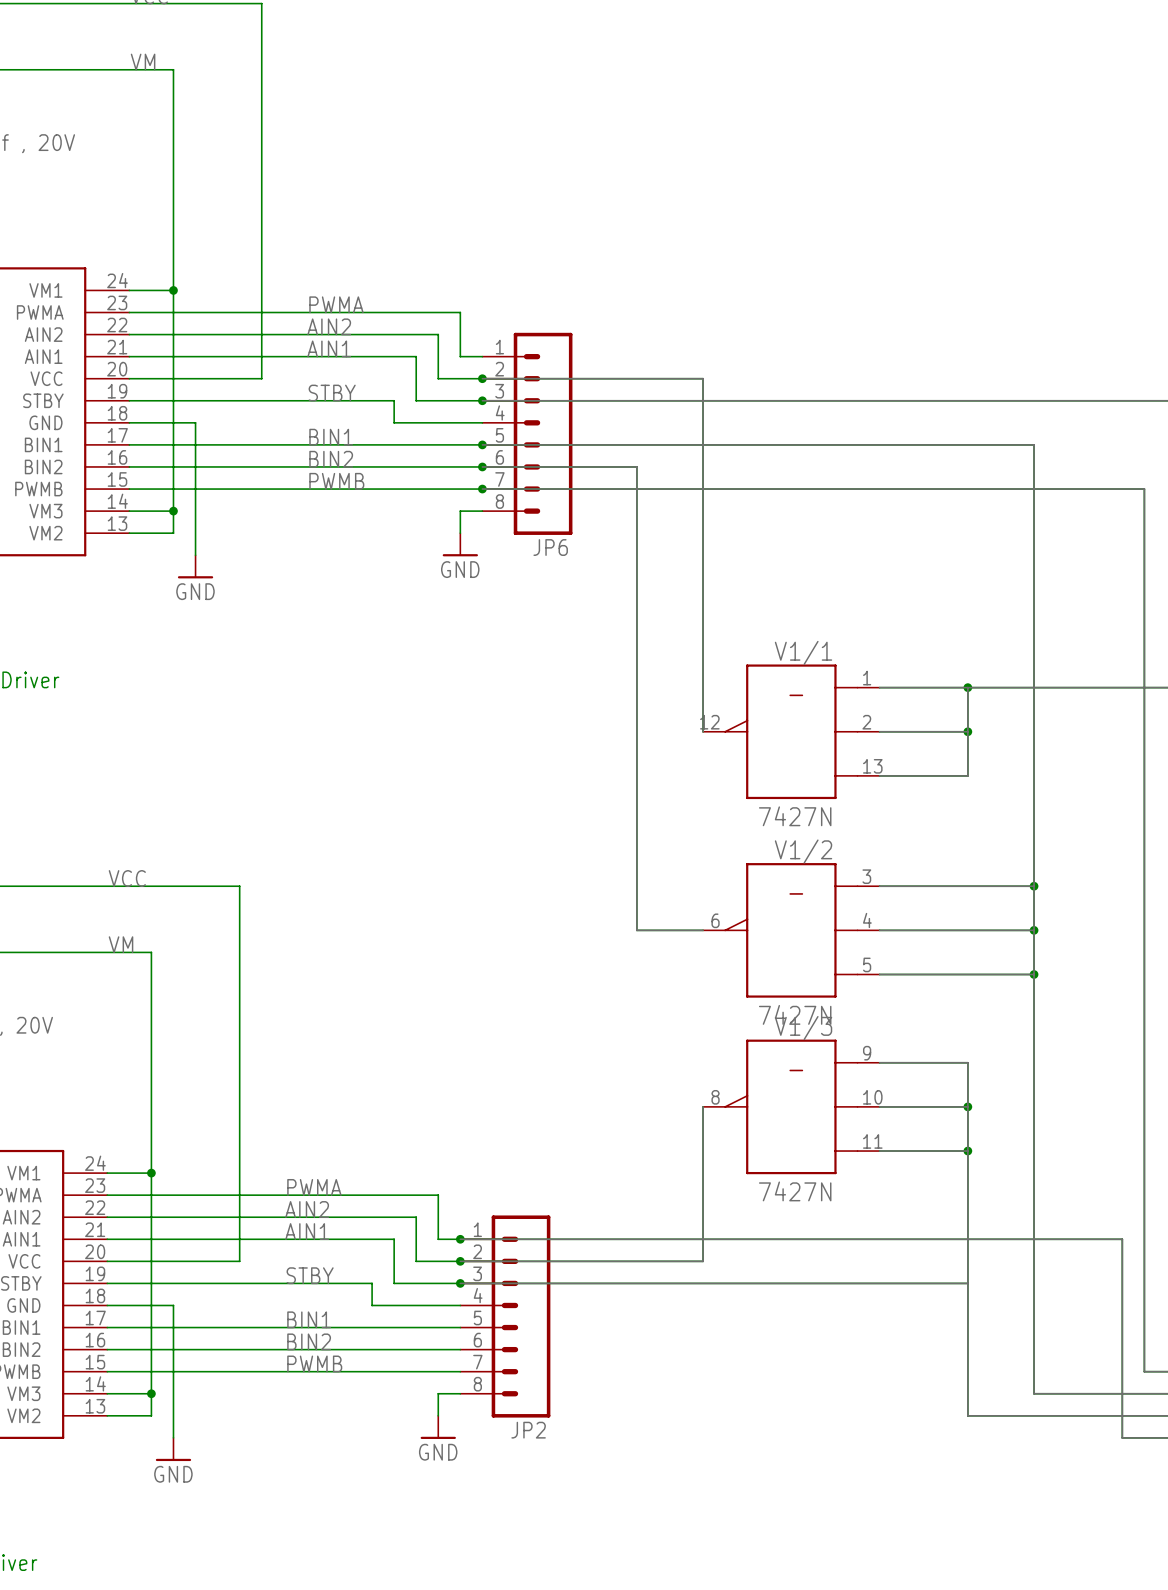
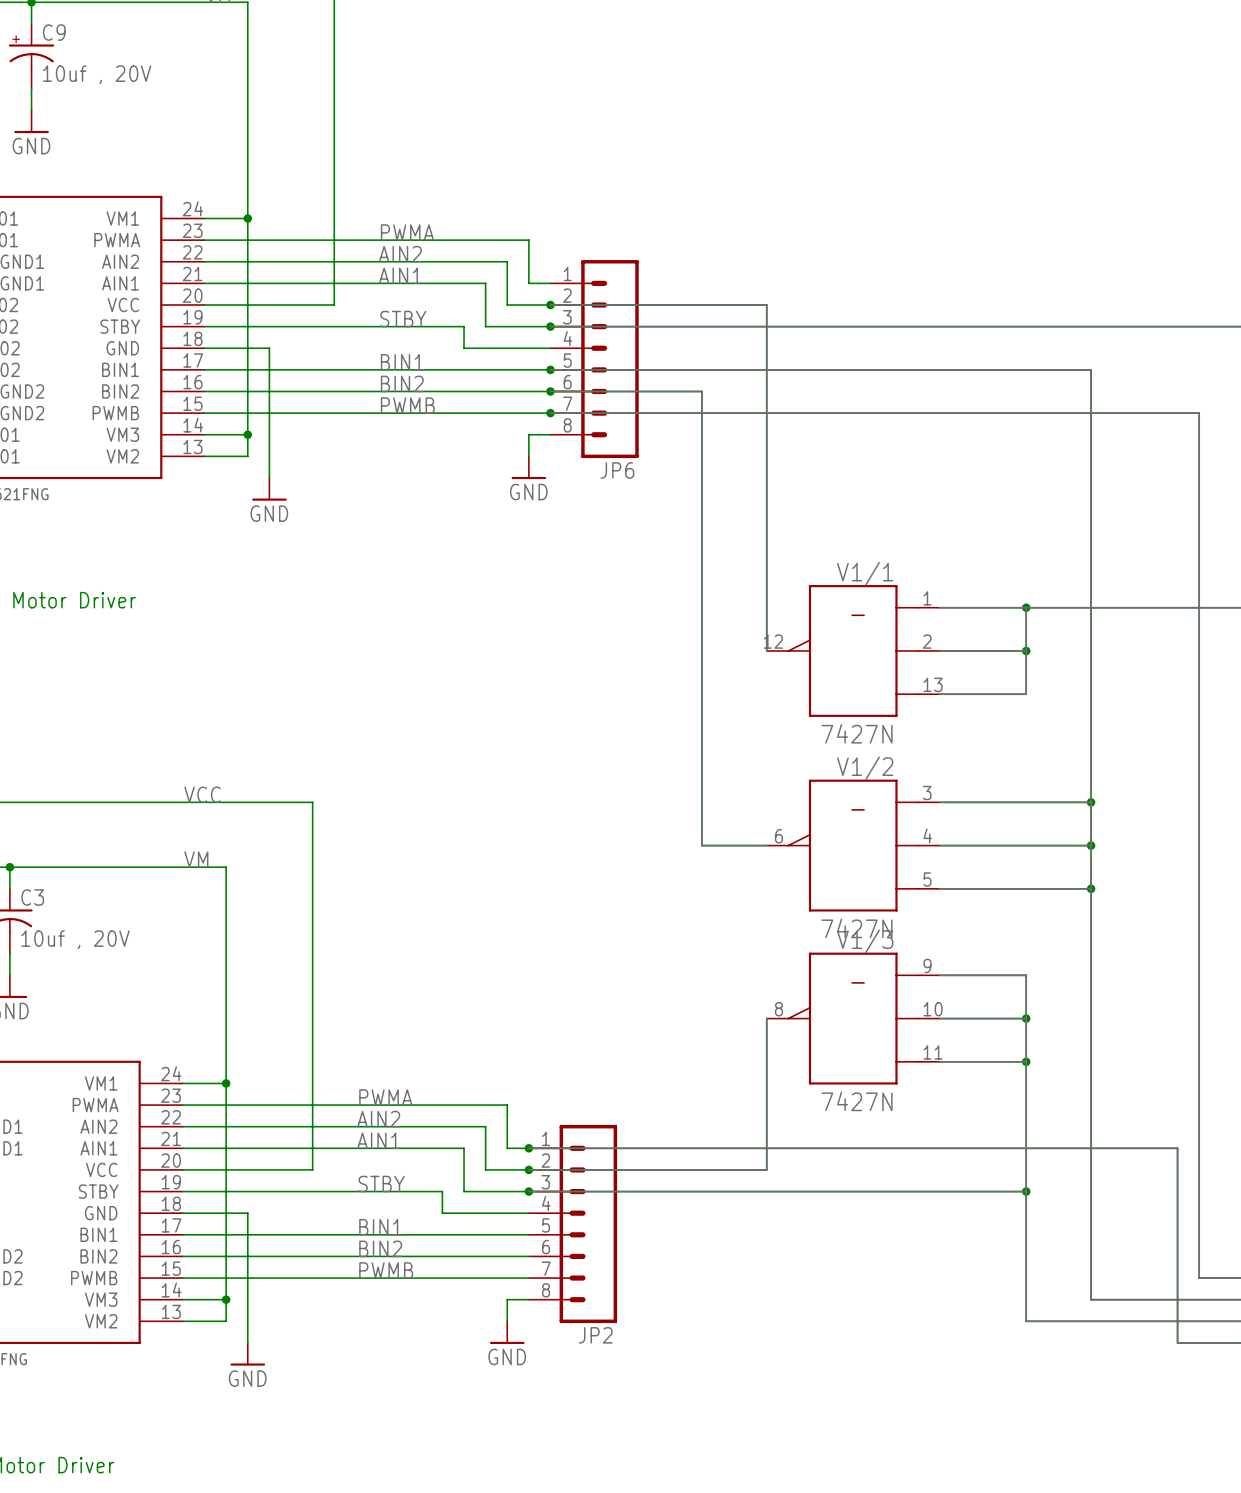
junction: none -> (1026, 1191)

